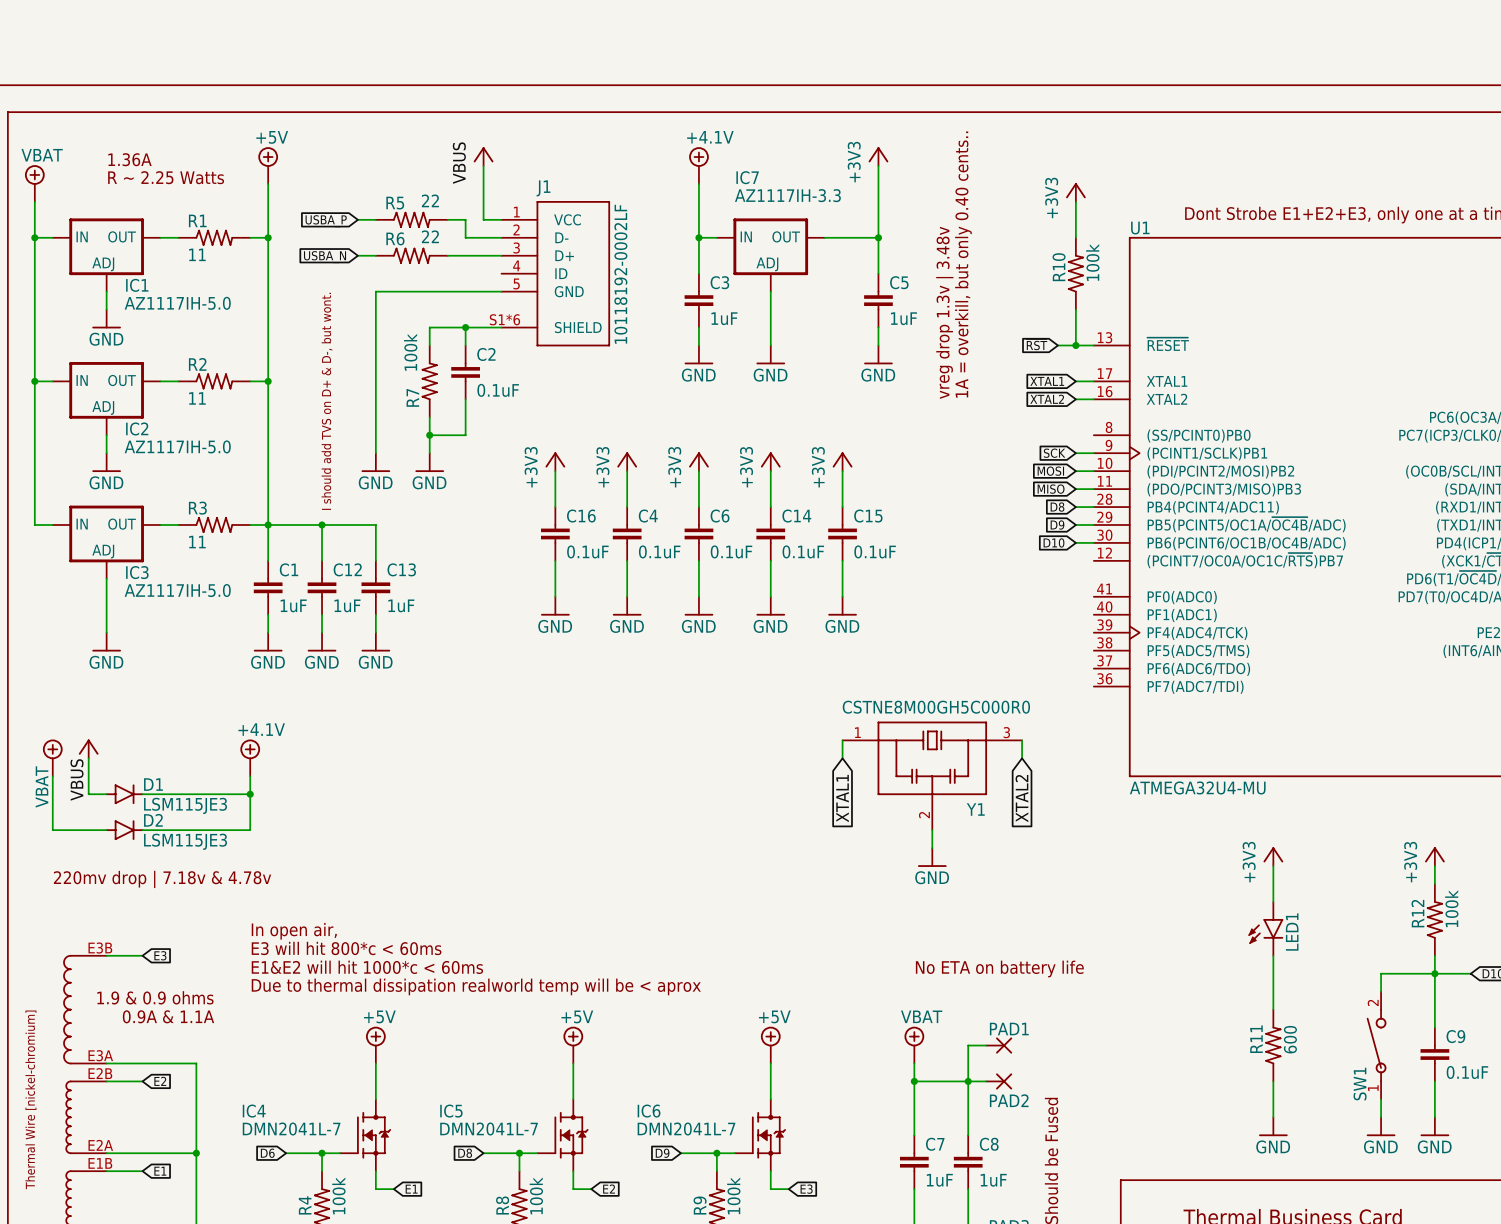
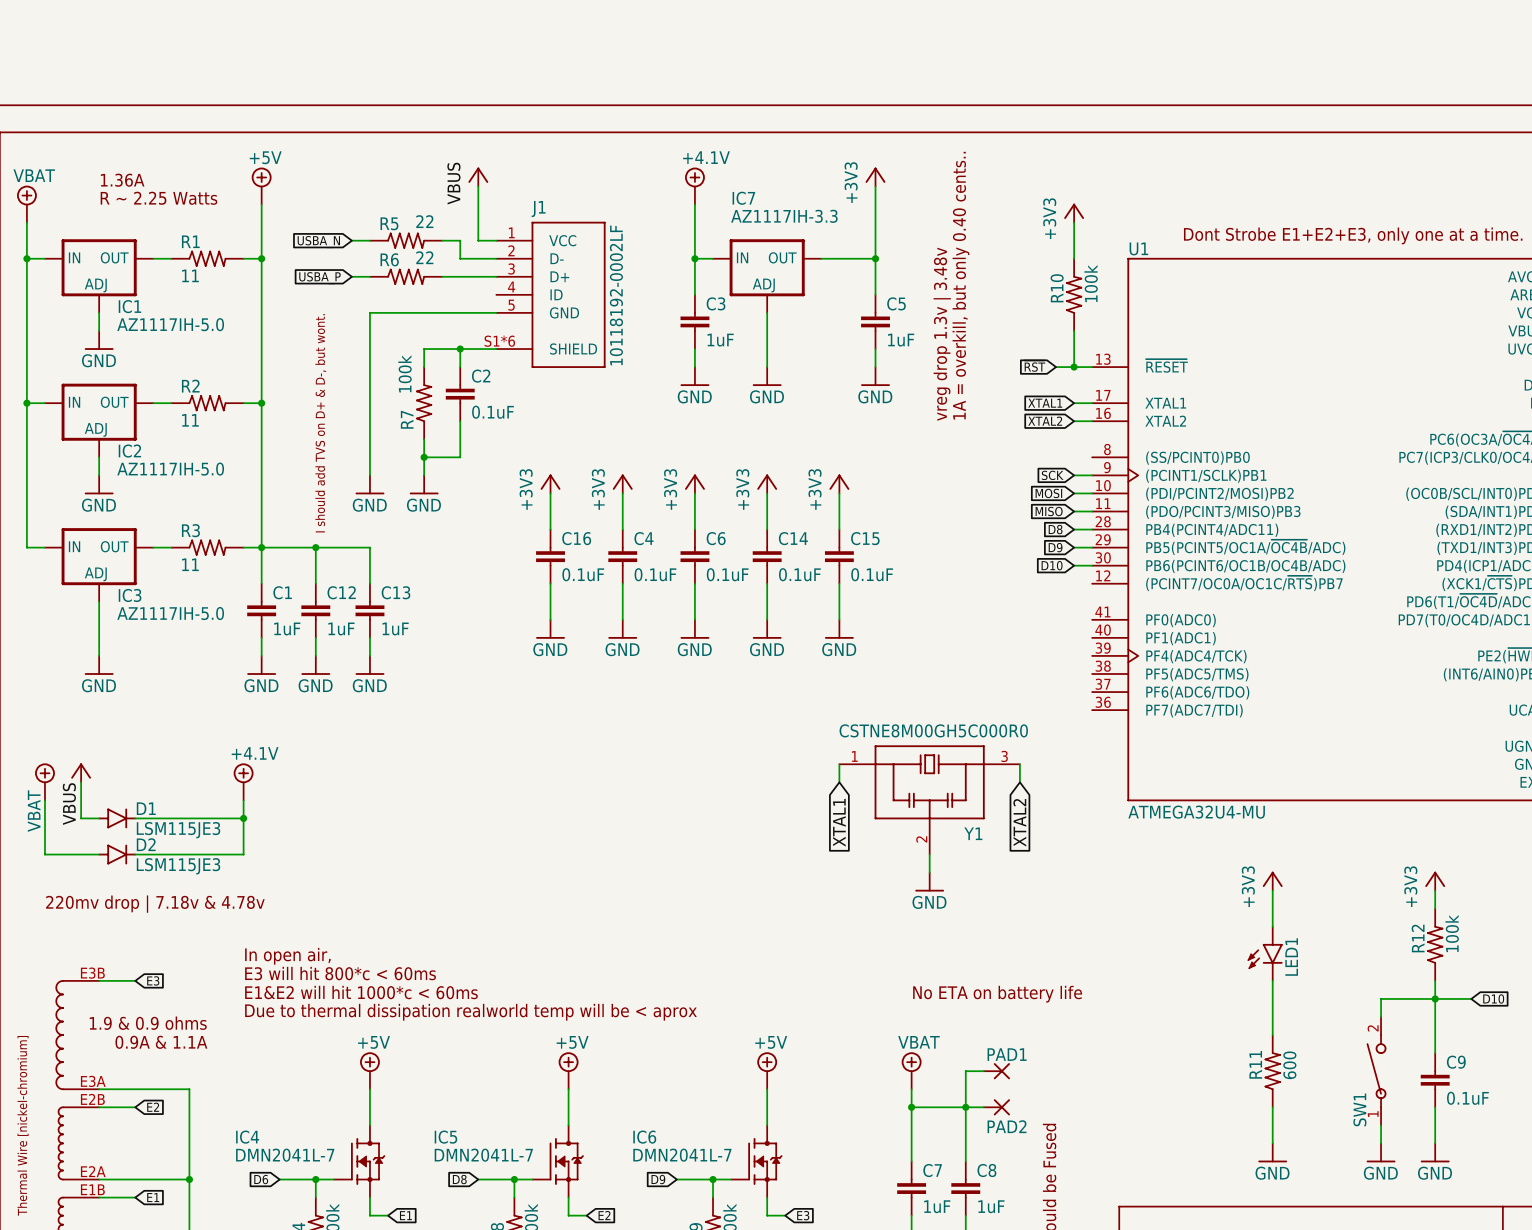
global label: USBA_P (326, 221) -> USBA_N (318, 242)
global label: USBA_N (325, 257) -> USBA_P (319, 278)

